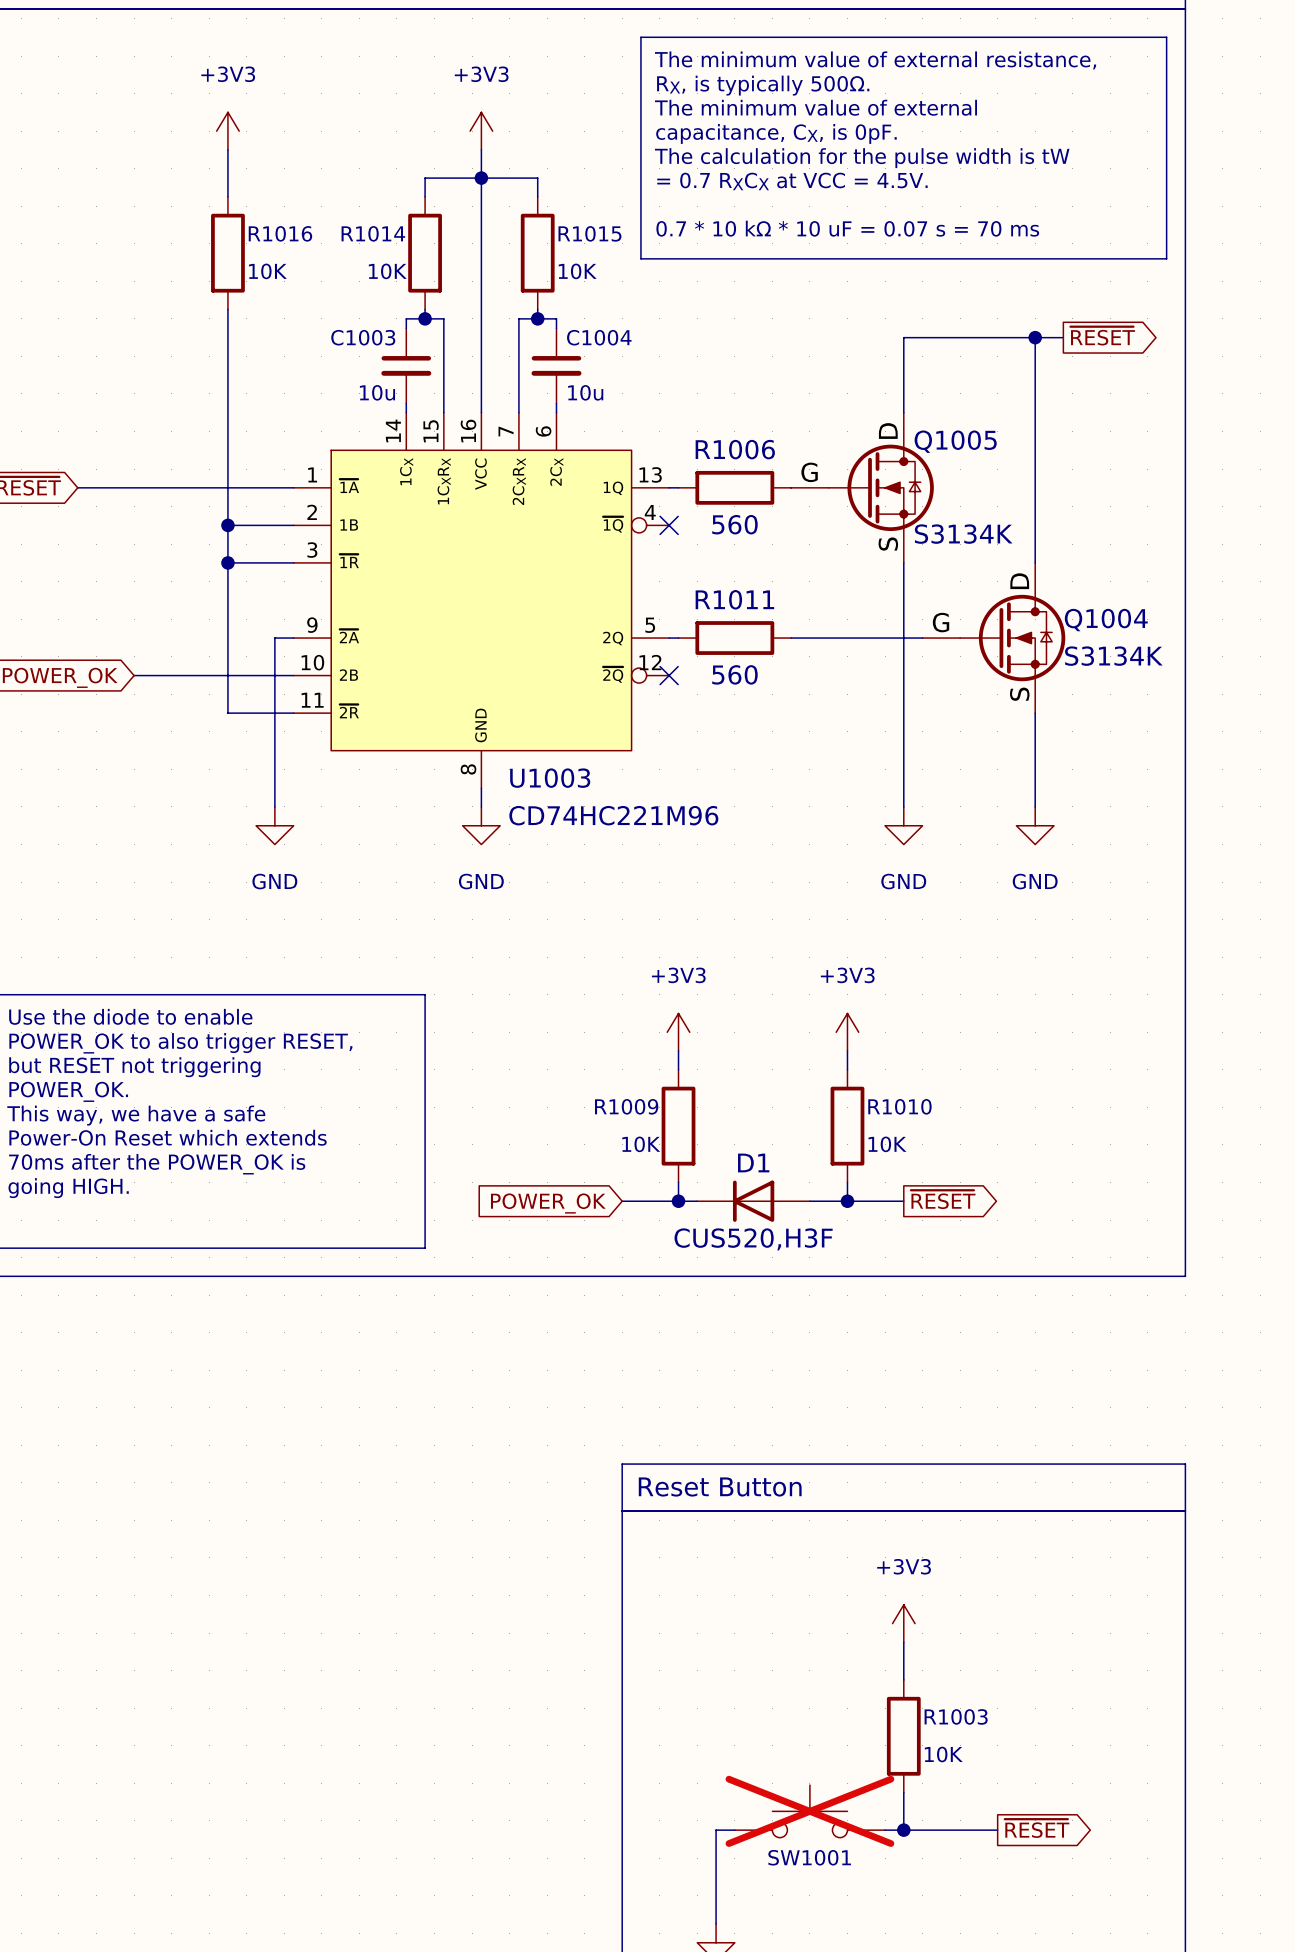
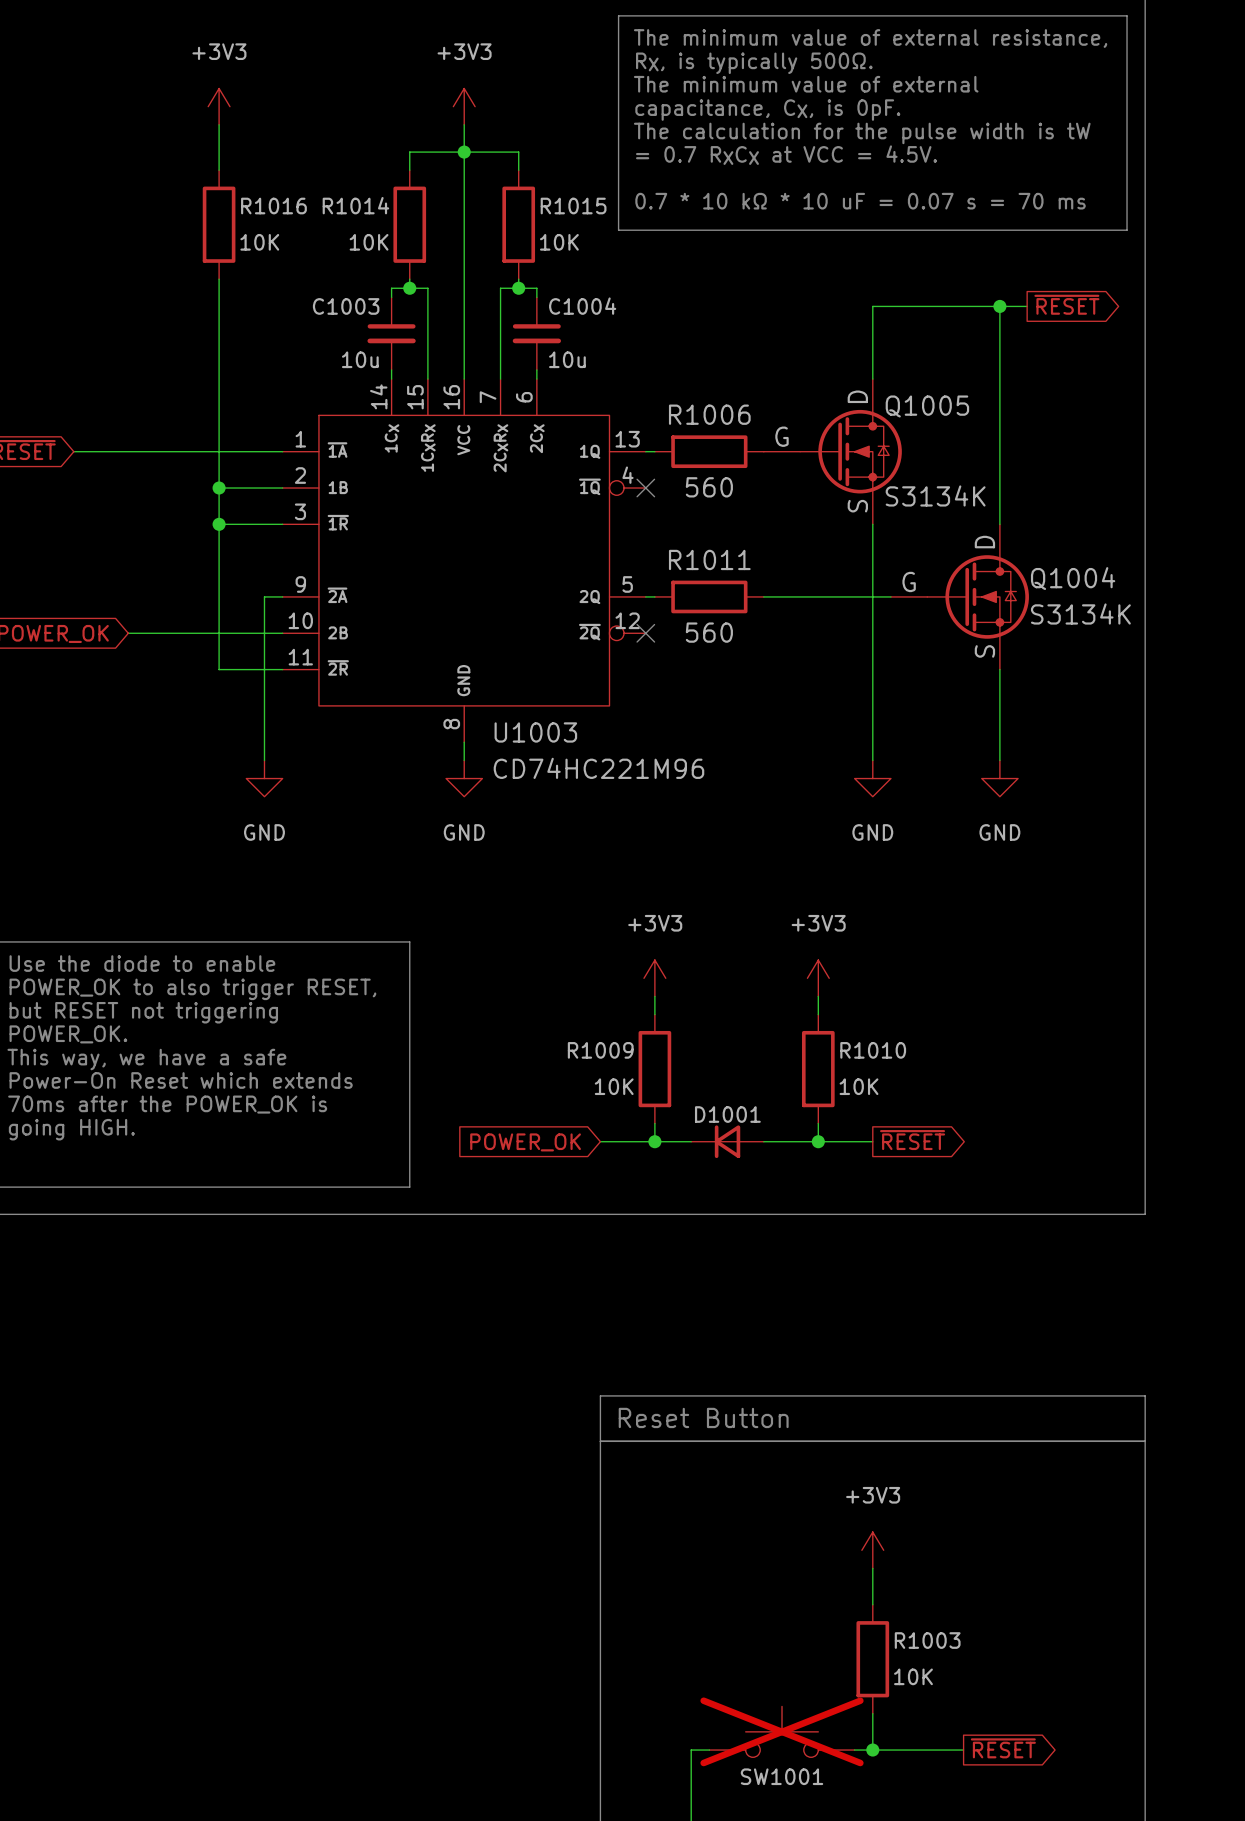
D1: CUS520,H3F (753, 1201) -> none
D1001: none -> (727, 1141)

